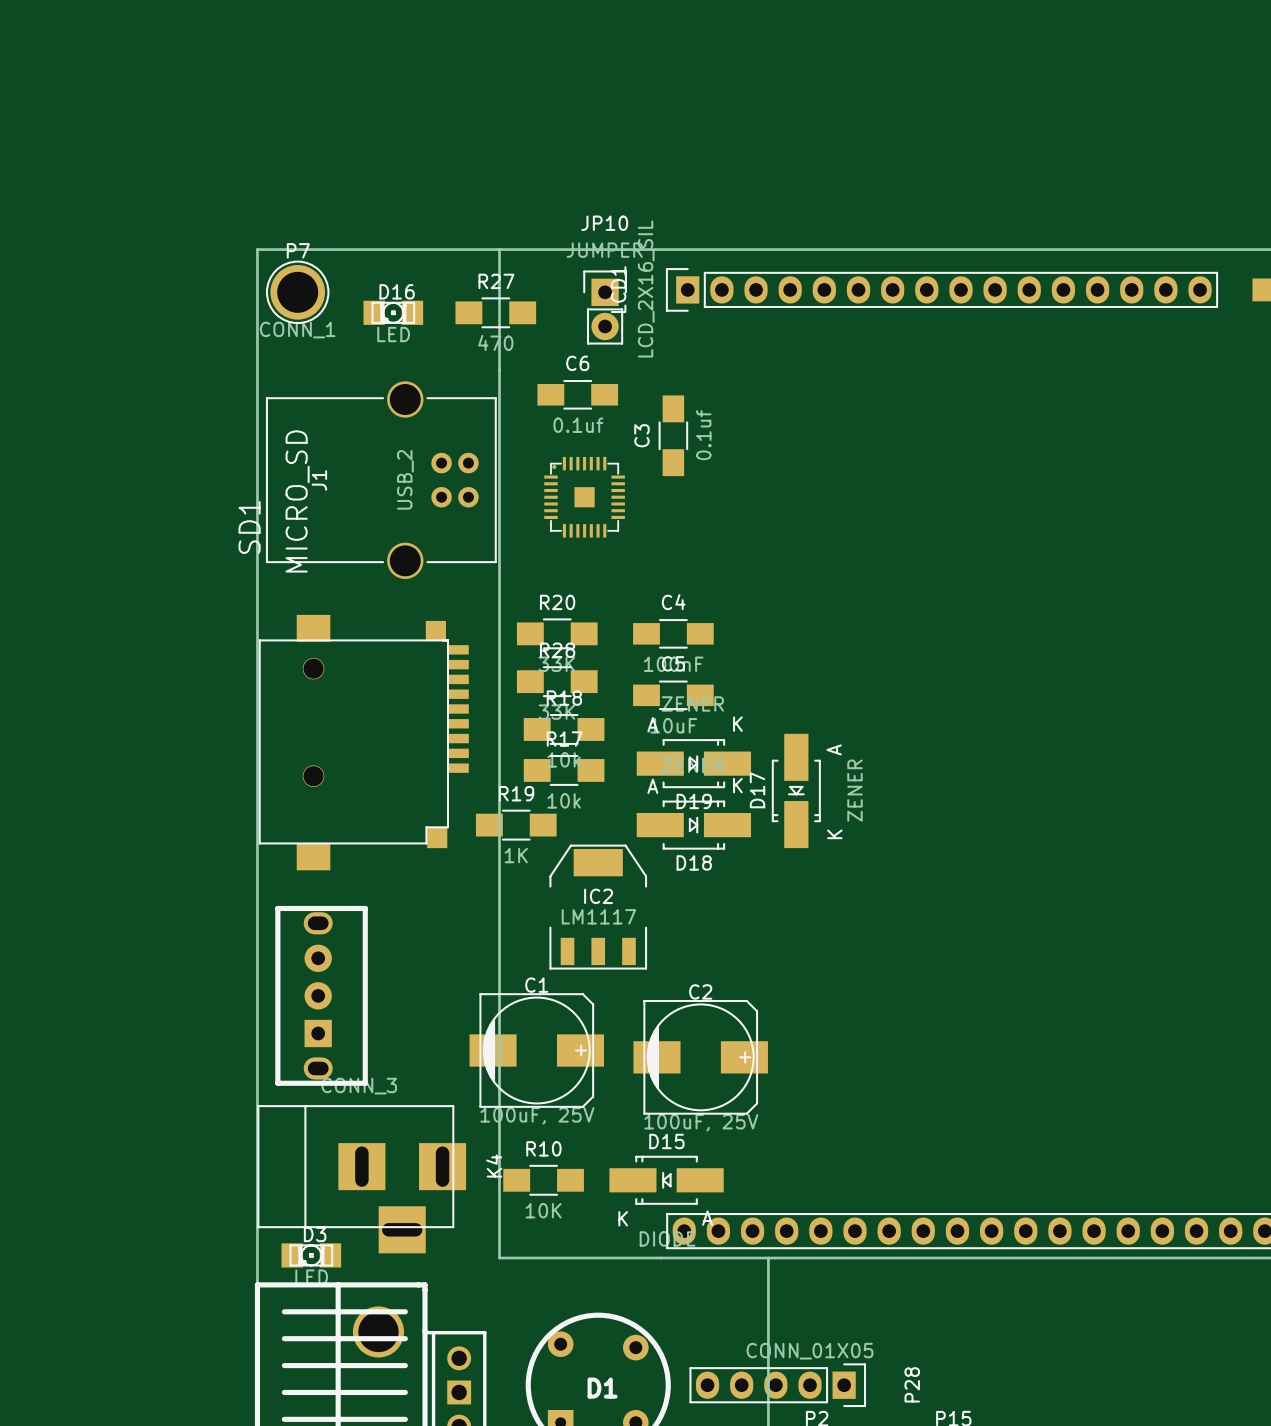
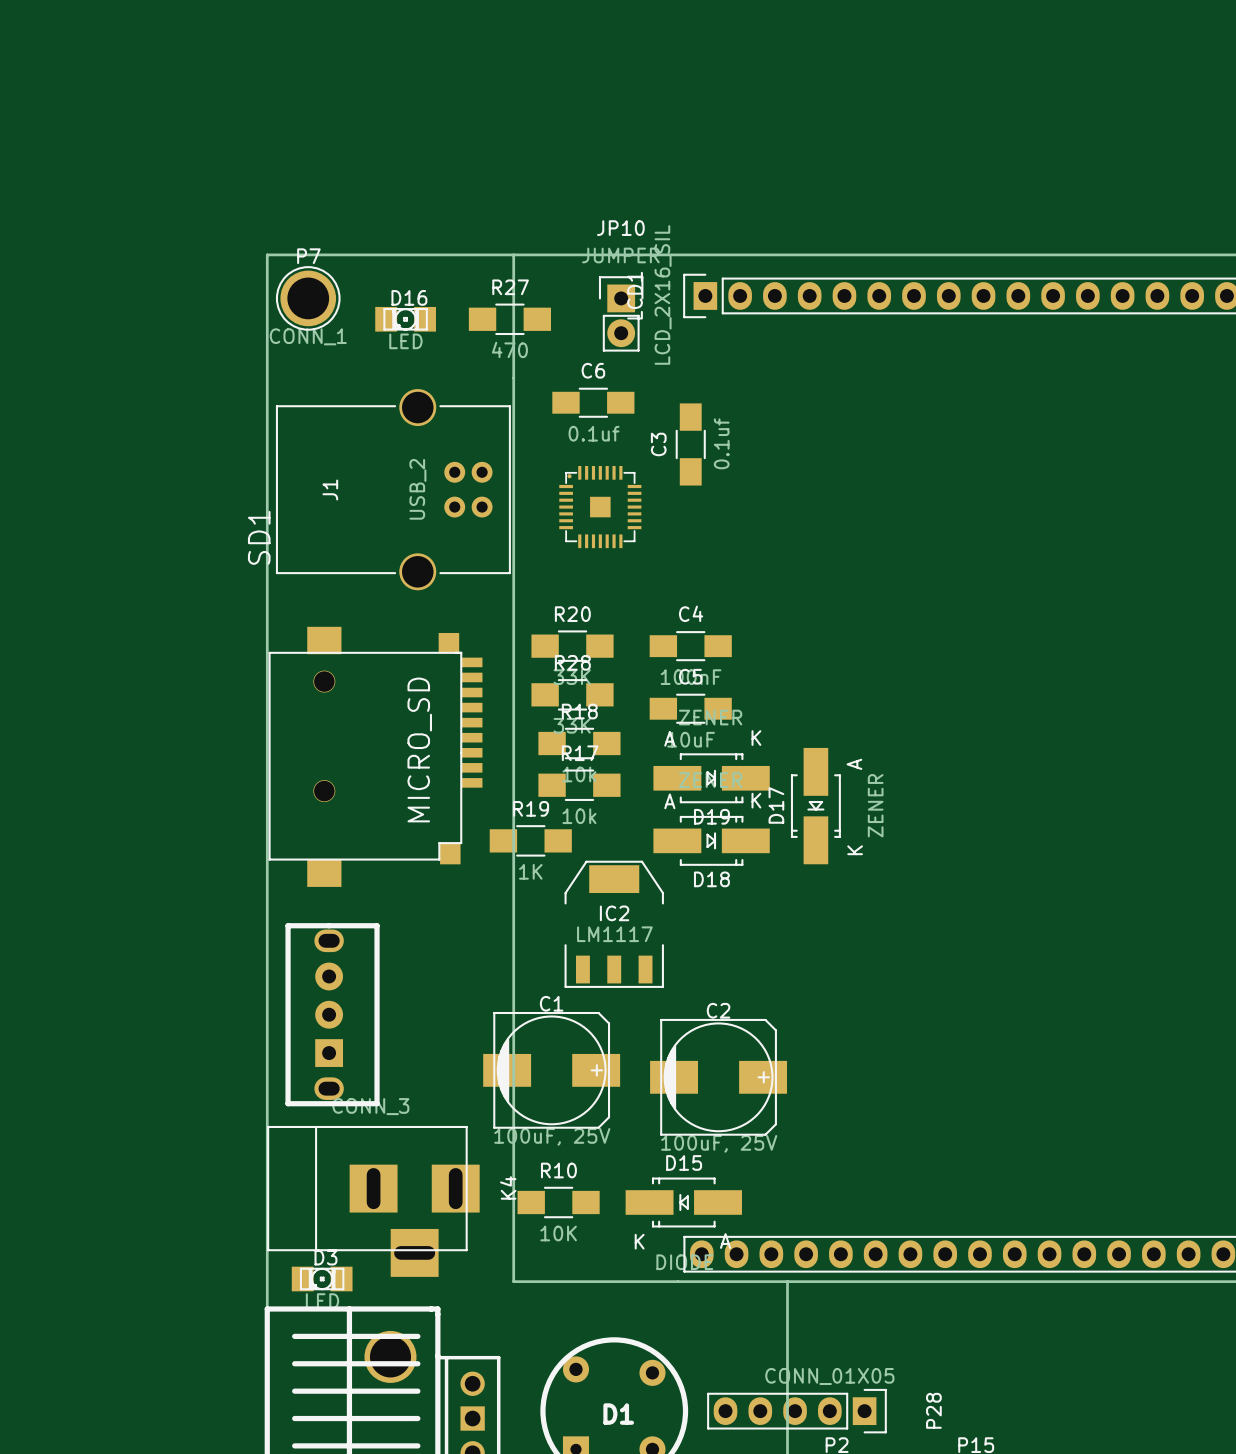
SD1 value position: MICRO_SD (297, 501) -> MICRO_SD (419, 749)

